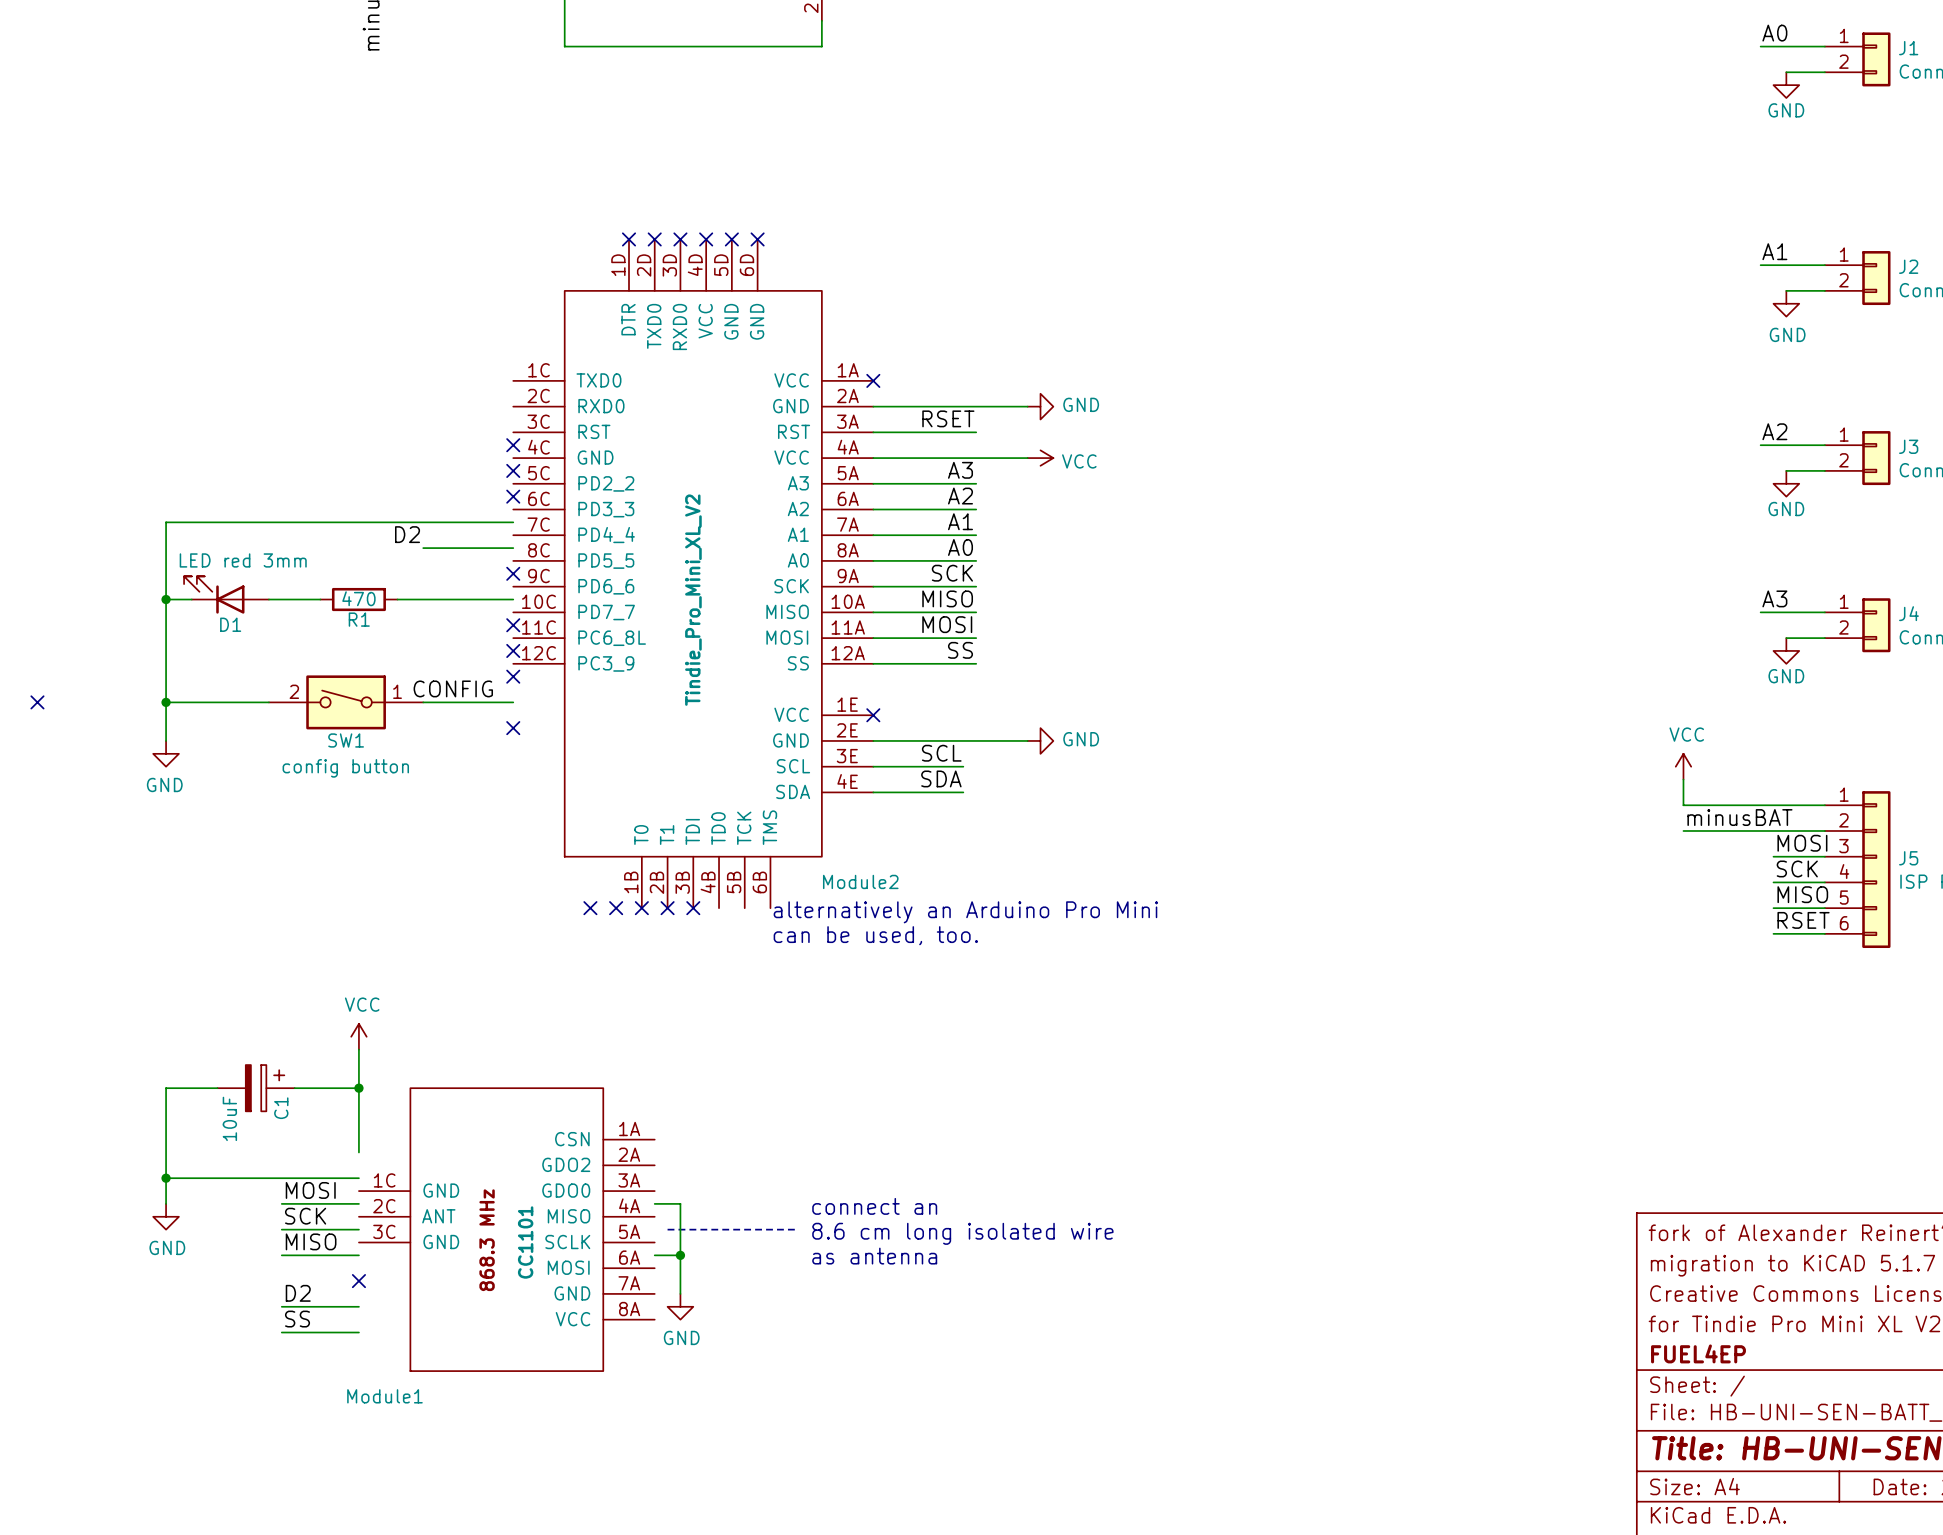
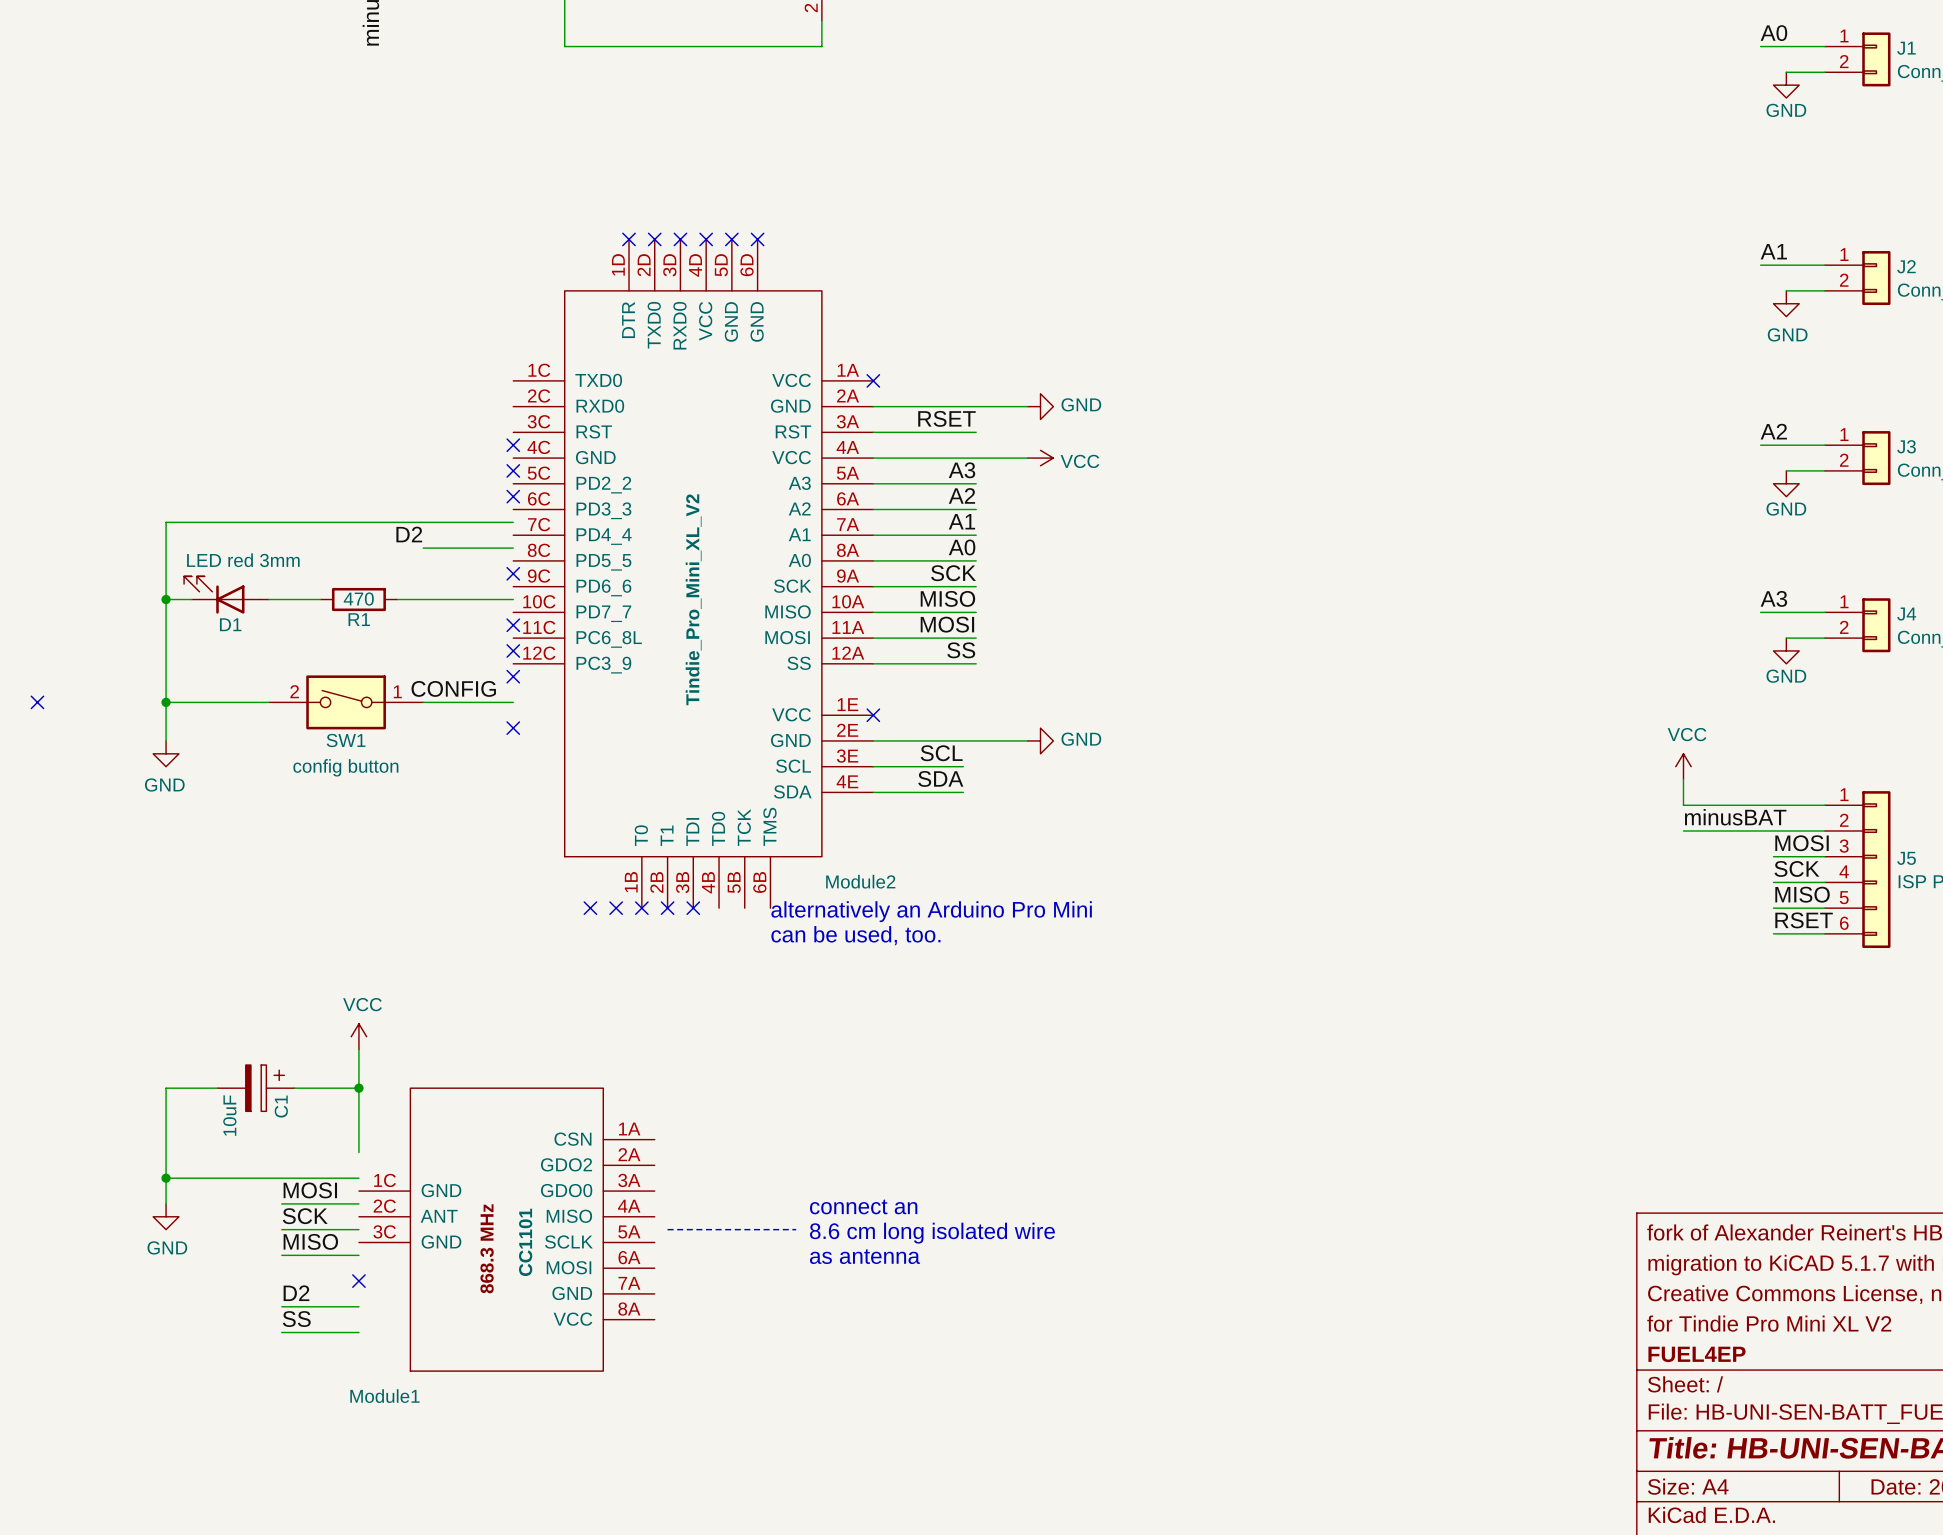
wire: (654, 1203) (680, 1203) (680, 1293) -> none
wire: (654, 1255) (680, 1255) -> none
junction: (680, 1255) -> none
power symbol: GND (680, 1306) -> none

